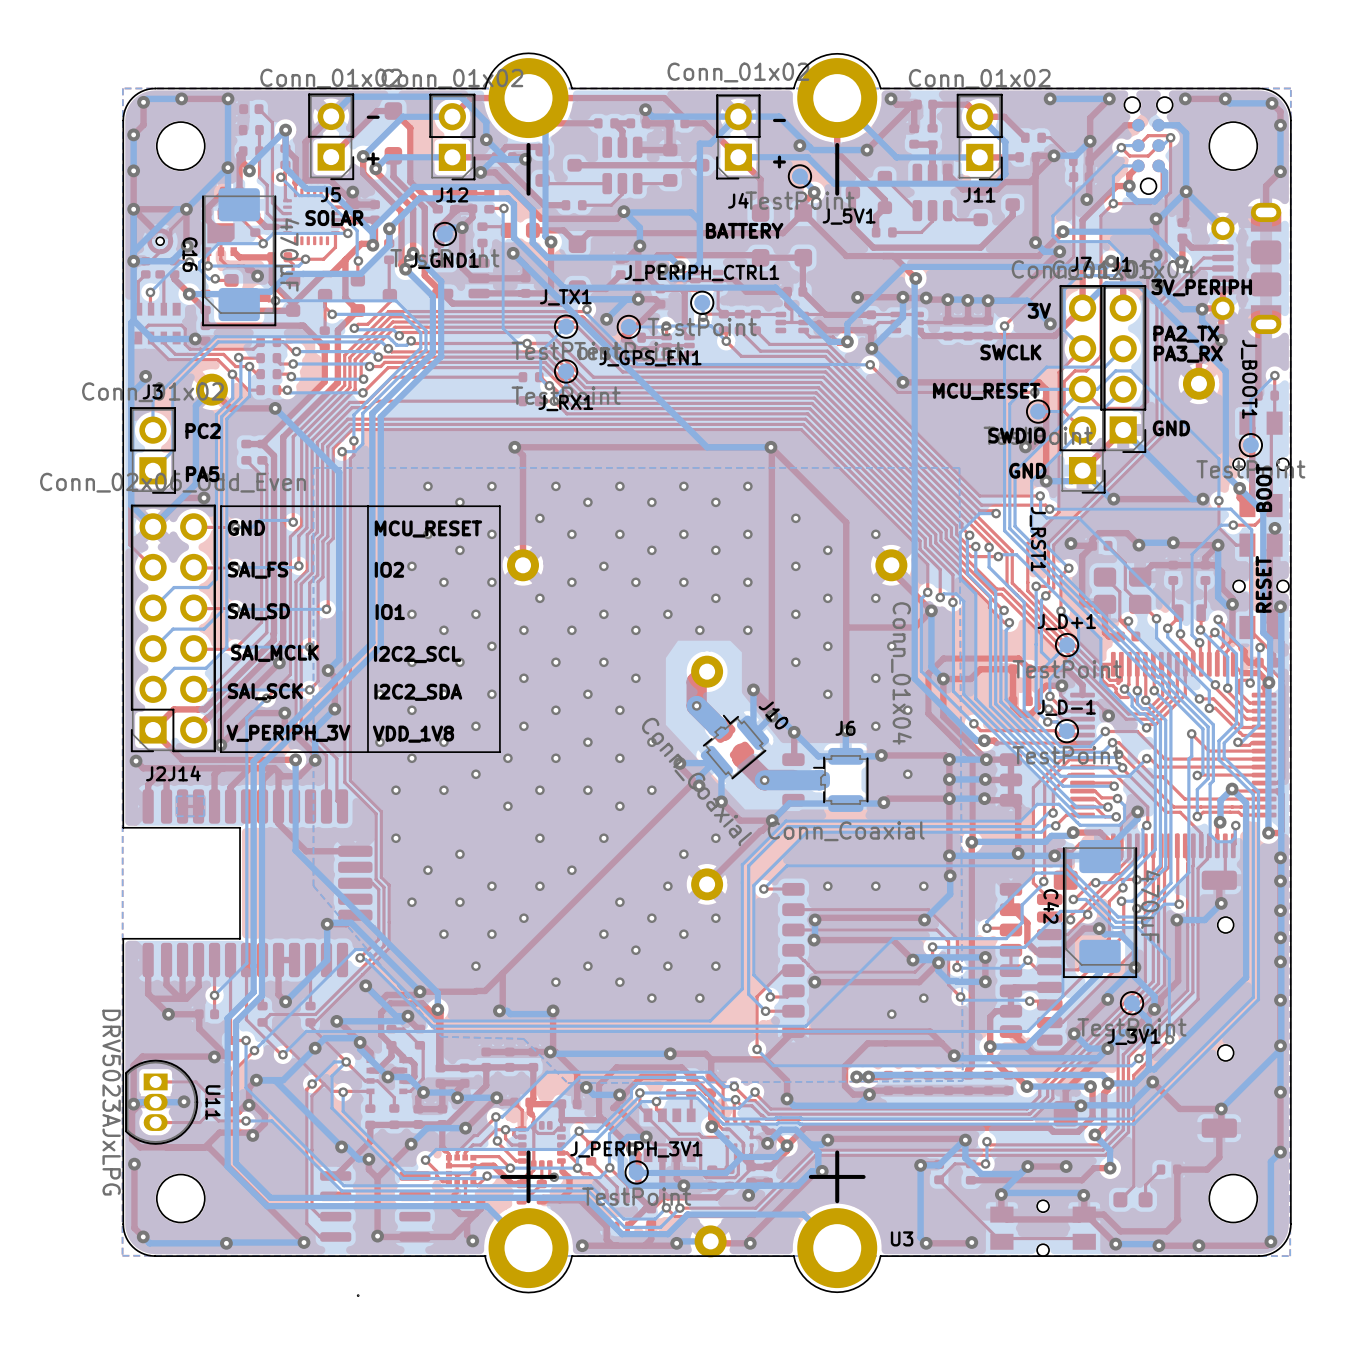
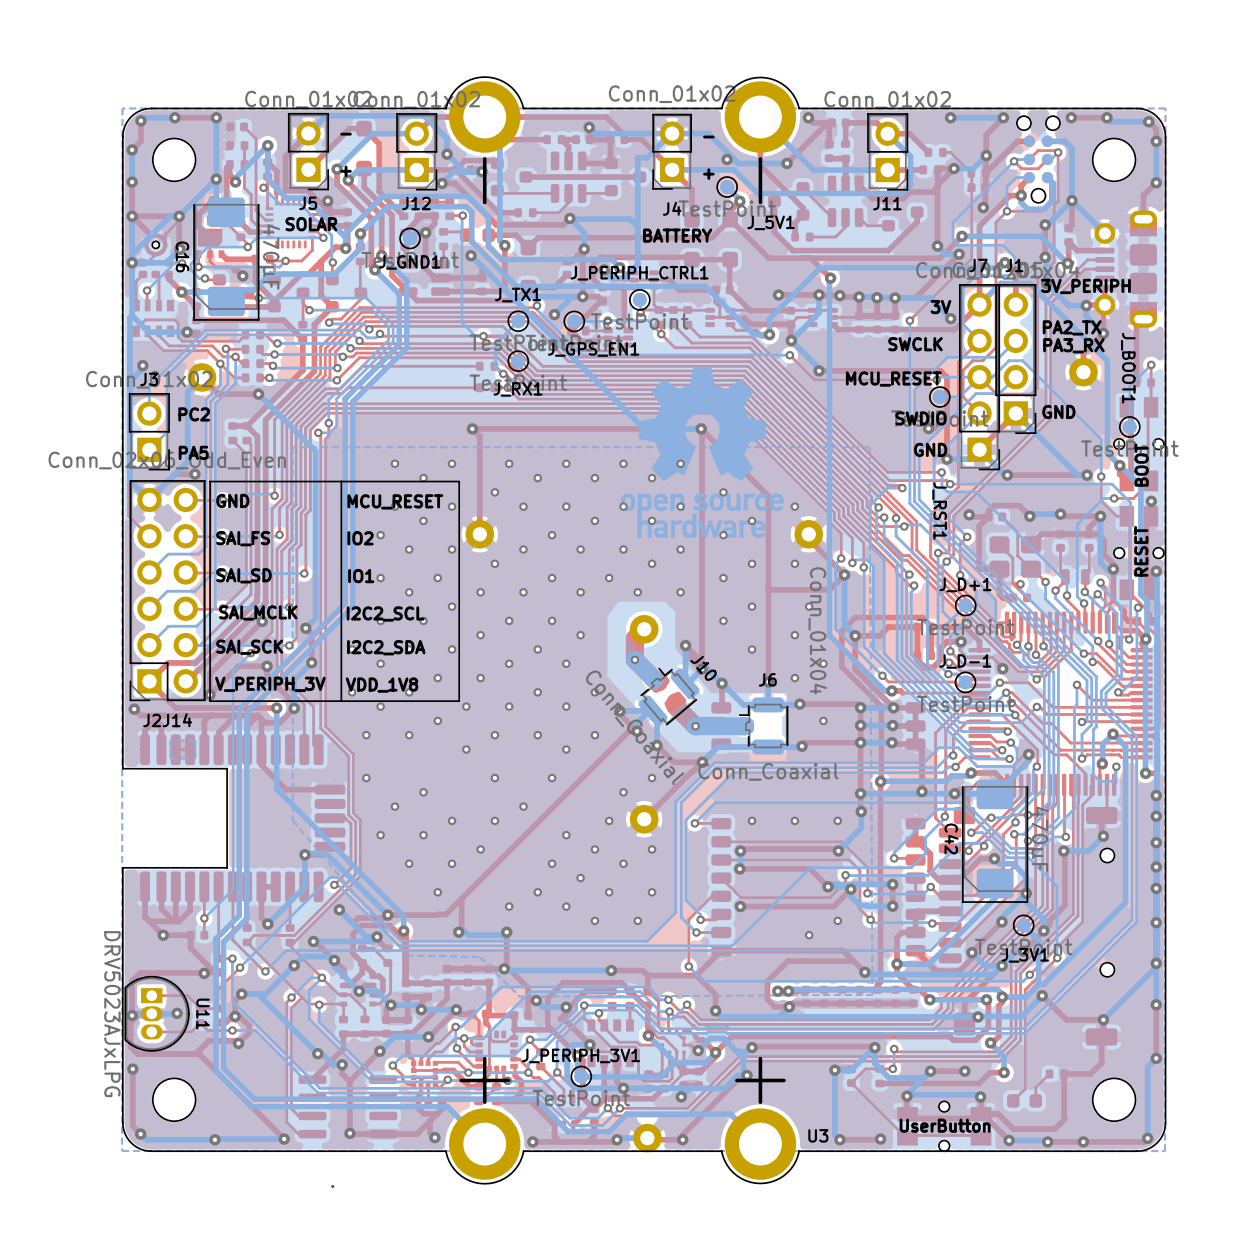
drawing: none -> [620, 367, 784, 538]
text: none -> UserButton (945, 1125)

